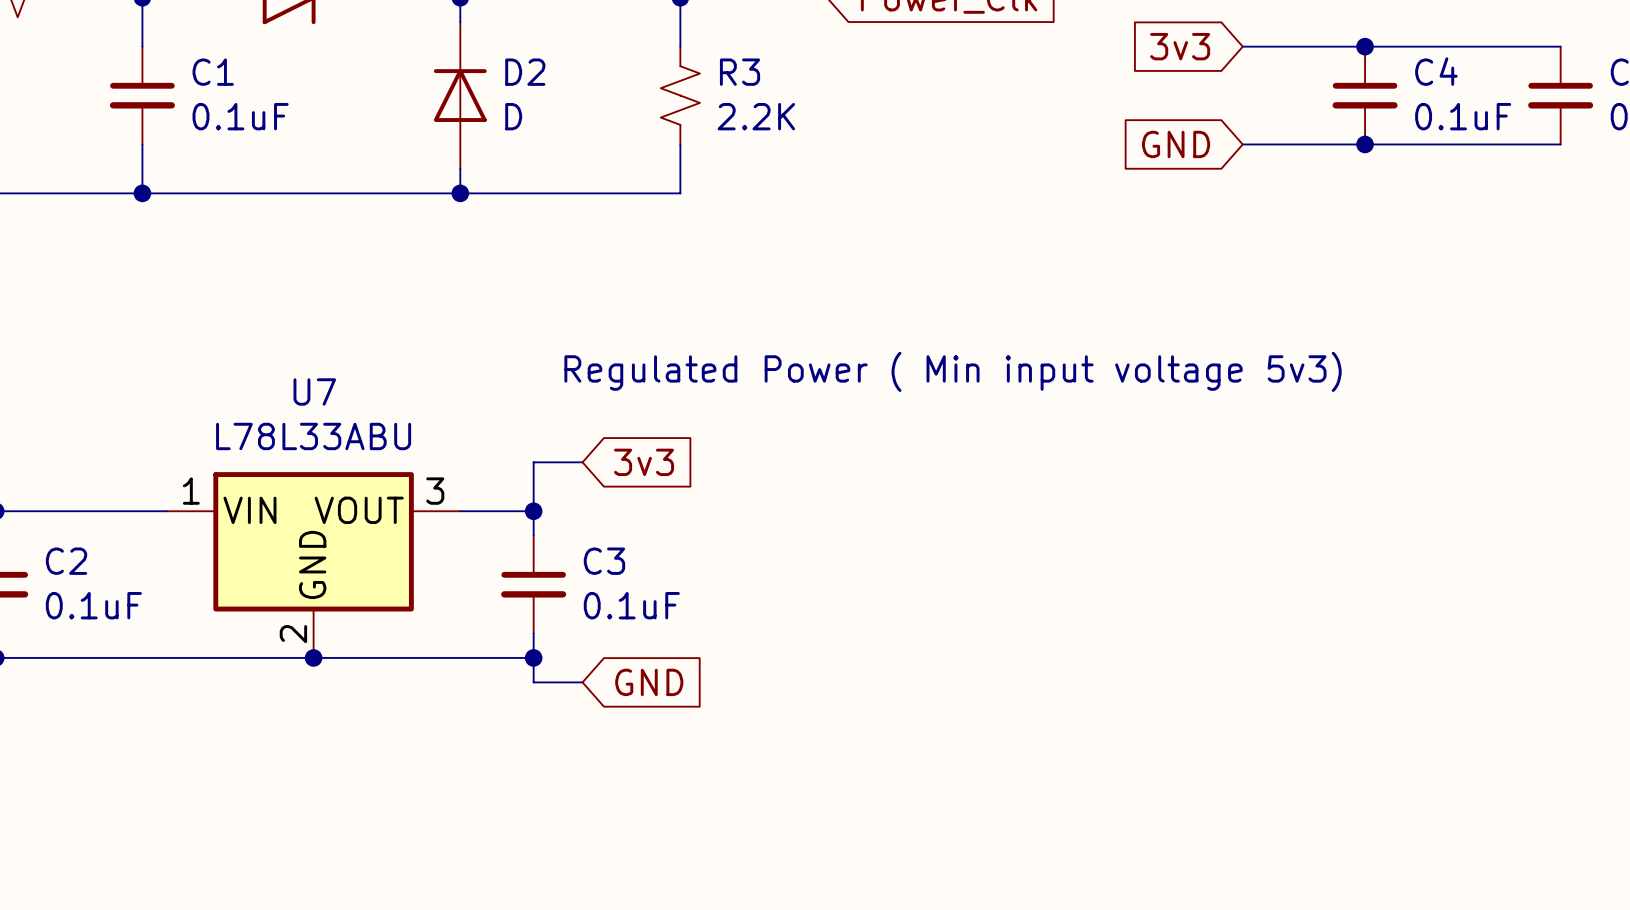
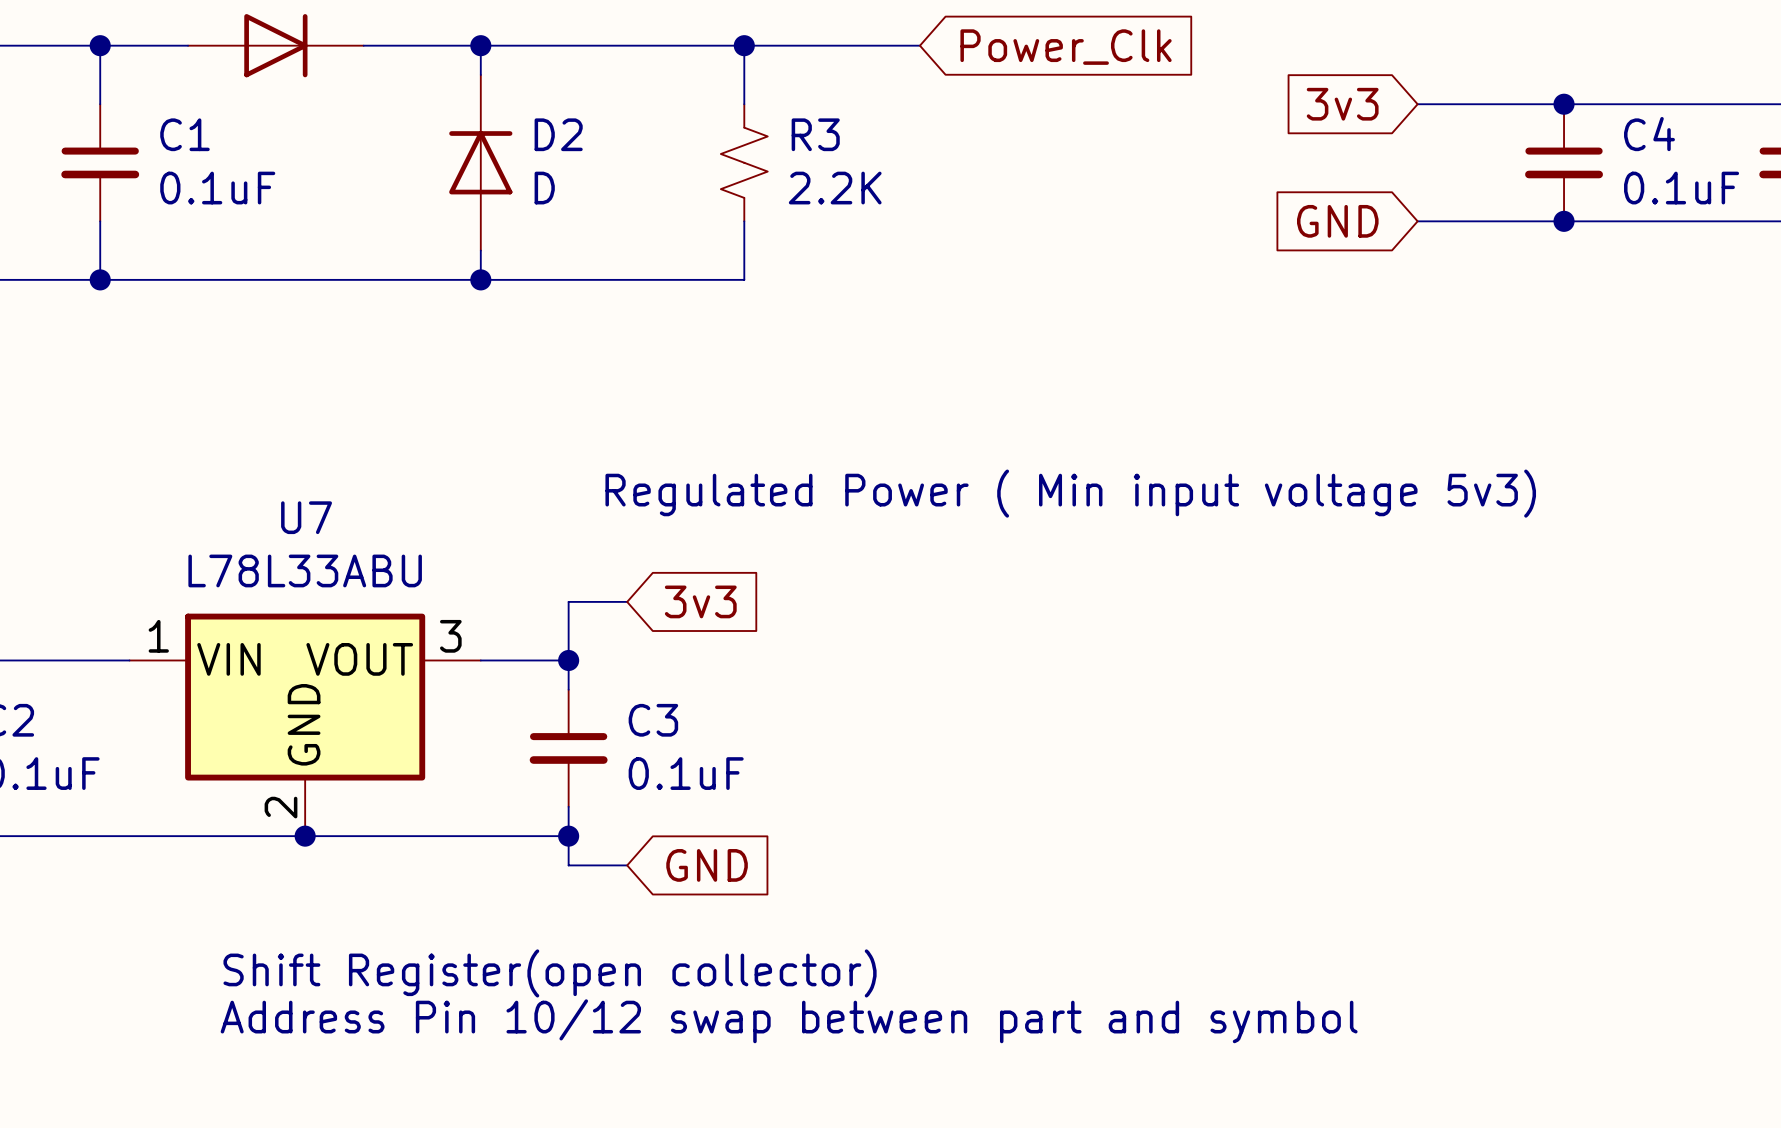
text: none -> Shift Register(open collector) (550, 973)
text: none -> Address Pin 10/12 swap between part and symbol (789, 1021)

